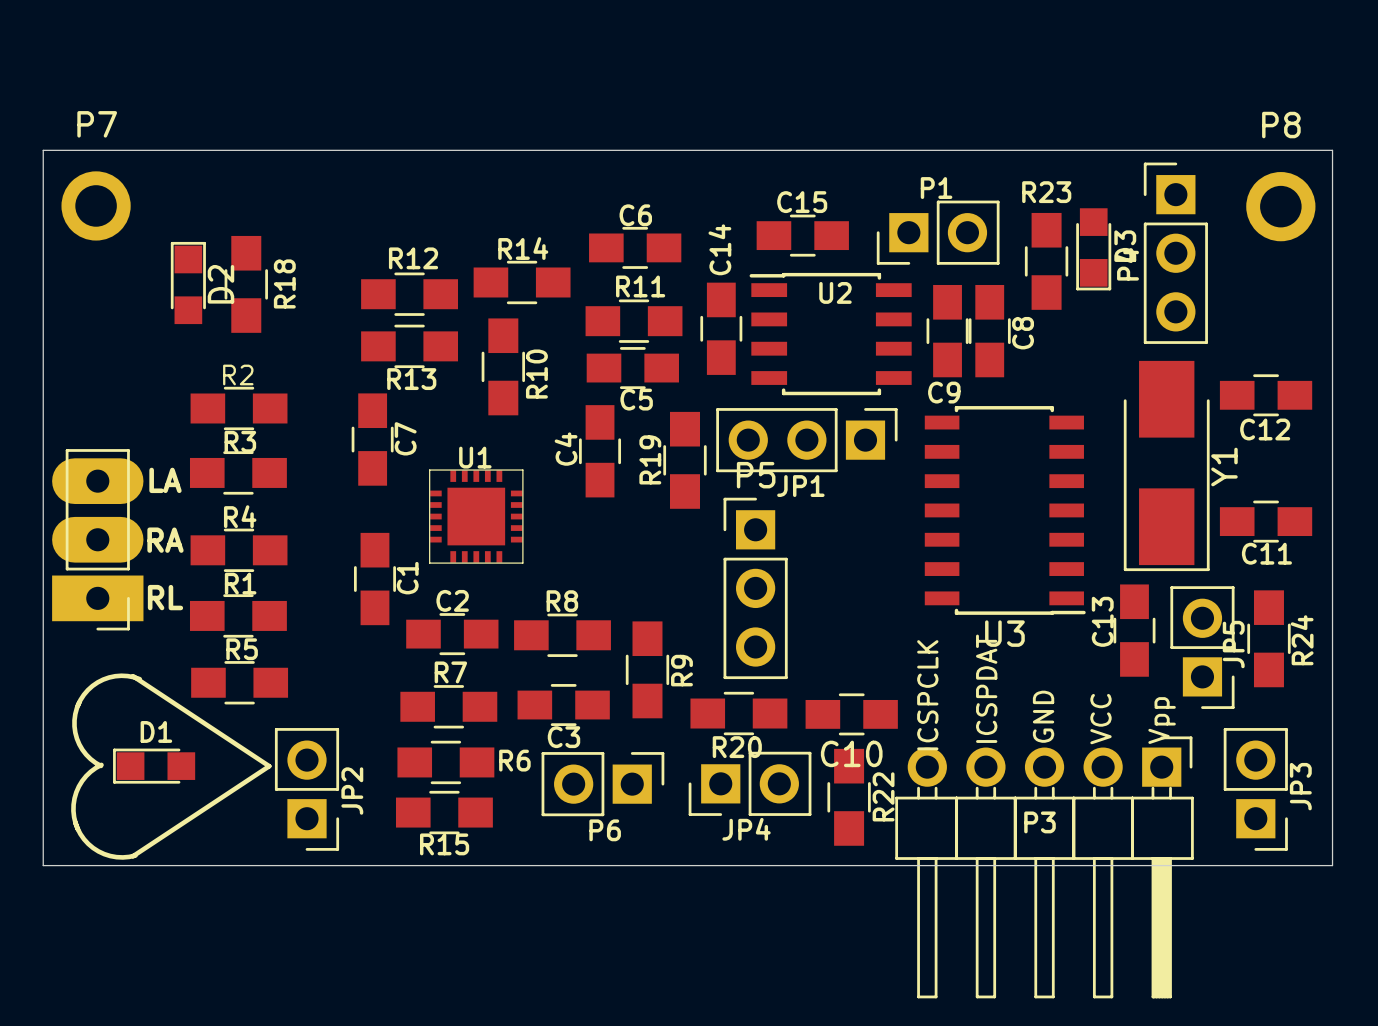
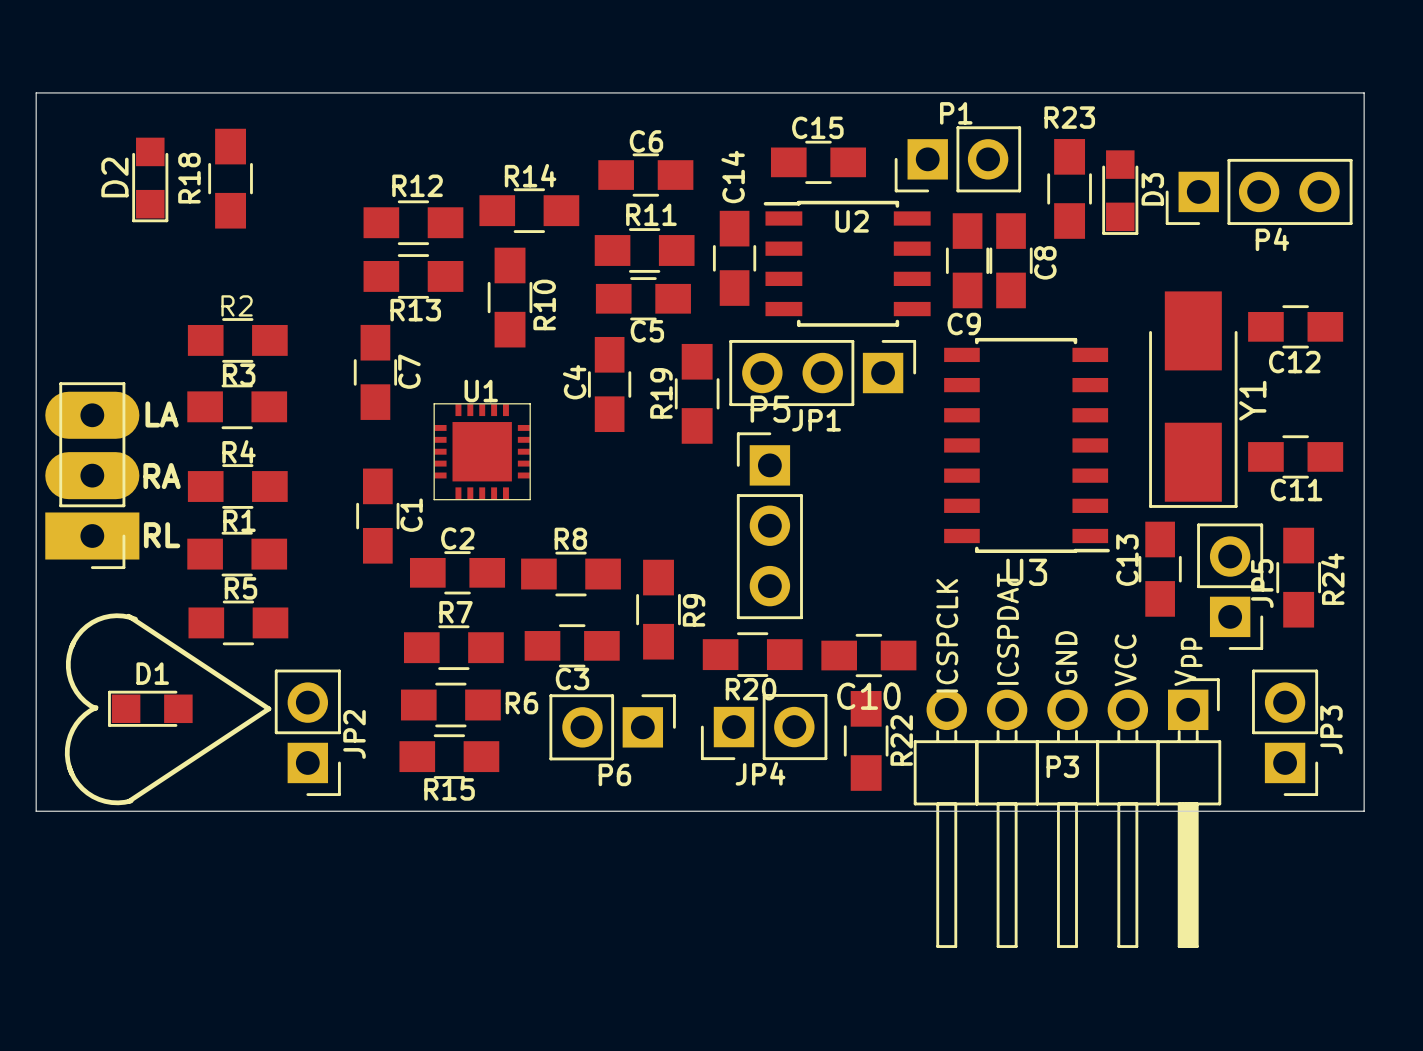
board edge: (43, 168) (43, 150) (1332, 150) (1332, 168) -> (36, 92) (1364, 92)
P7: (96, 205) -> none
P8: (1280, 206) -> none
D3 position: (1093, 249) -> (1120, 192)
P4 rotation: 0° (1175, 253) -> 90° counterclockwise (1259, 191)
D2 rotation: 0° (188, 283) -> 180° (150, 179)
R18 name position: R18 (284, 283) -> R18 (189, 178)
R18 position: (246, 284) -> (230, 178)

